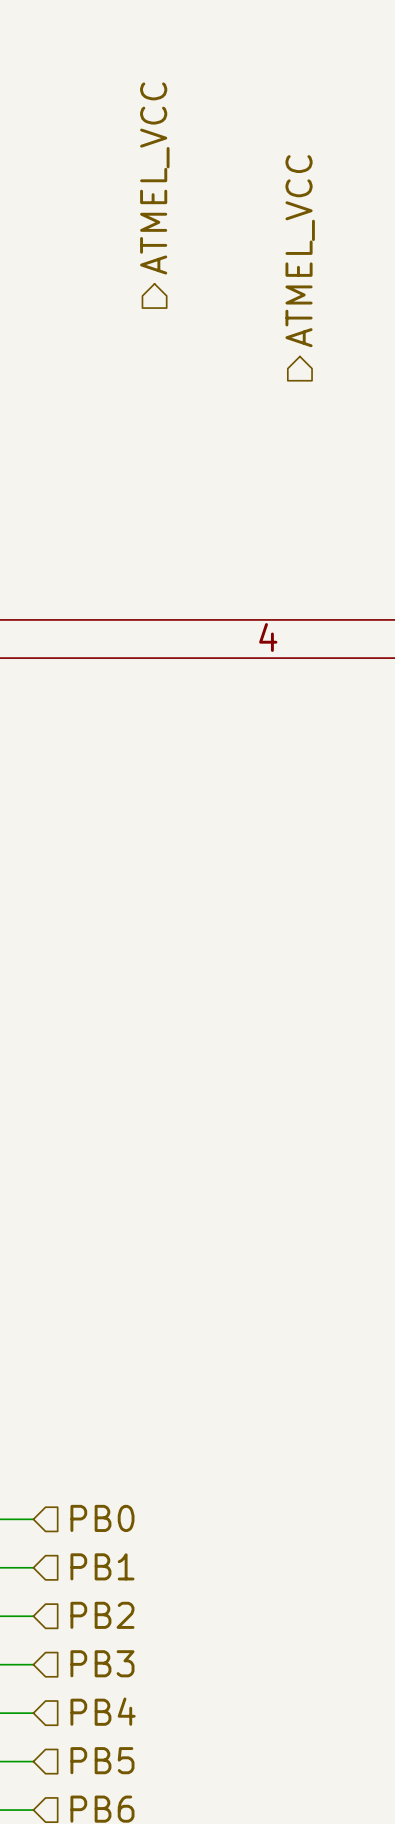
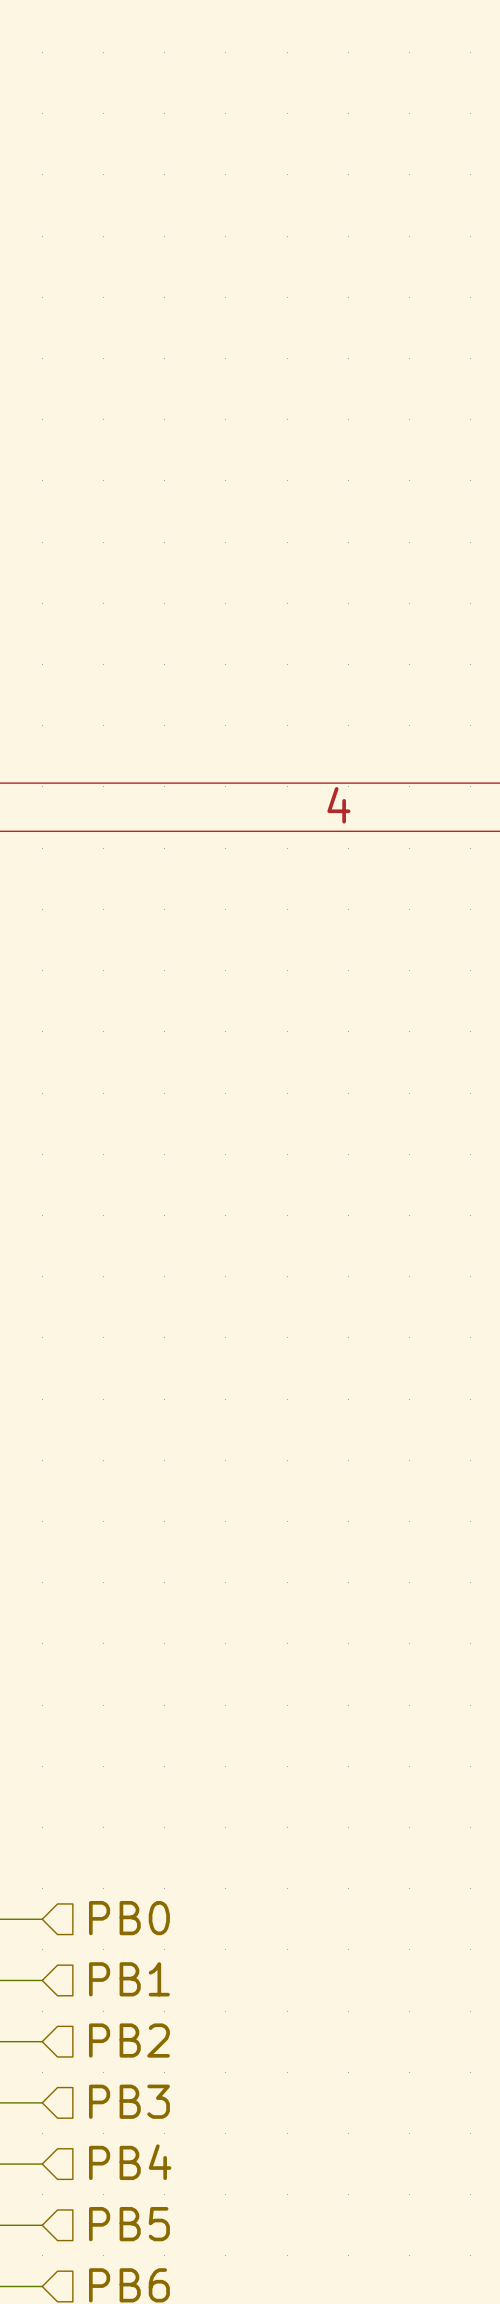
hierarchical label: ATMEL_VCC (154, 178) -> none
hierarchical label: ATMEL_VCC (300, 251) -> none

